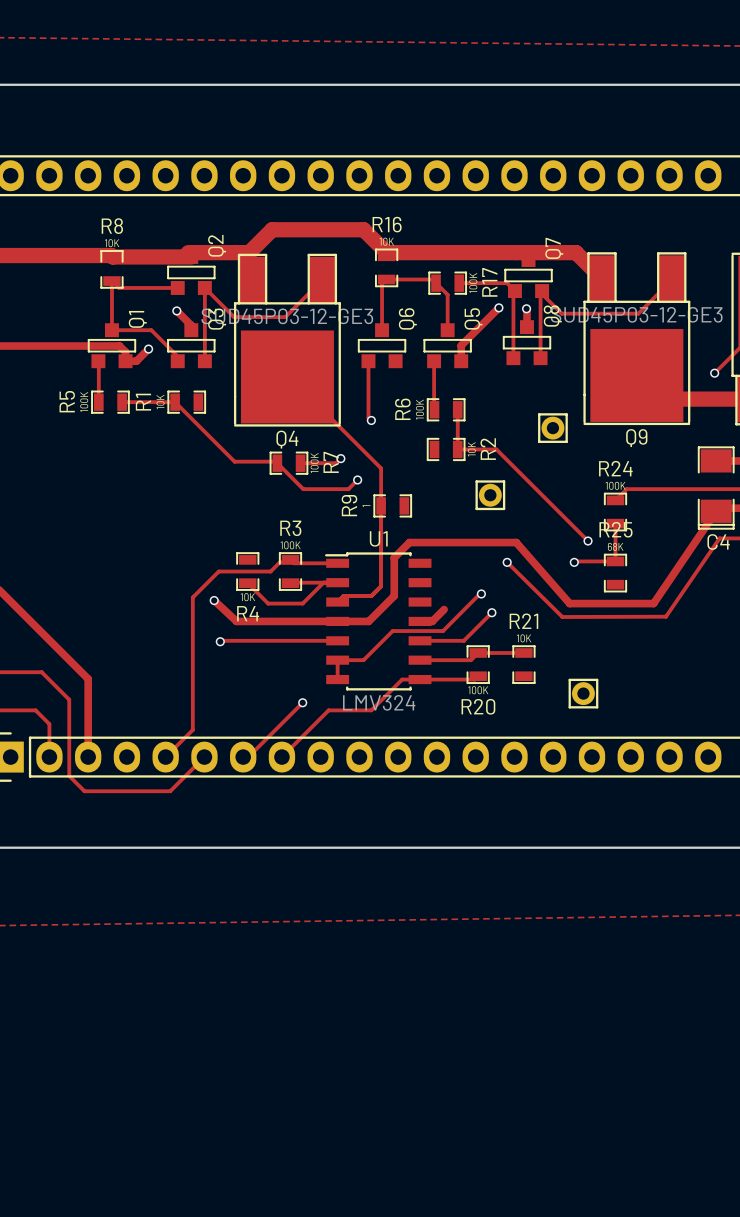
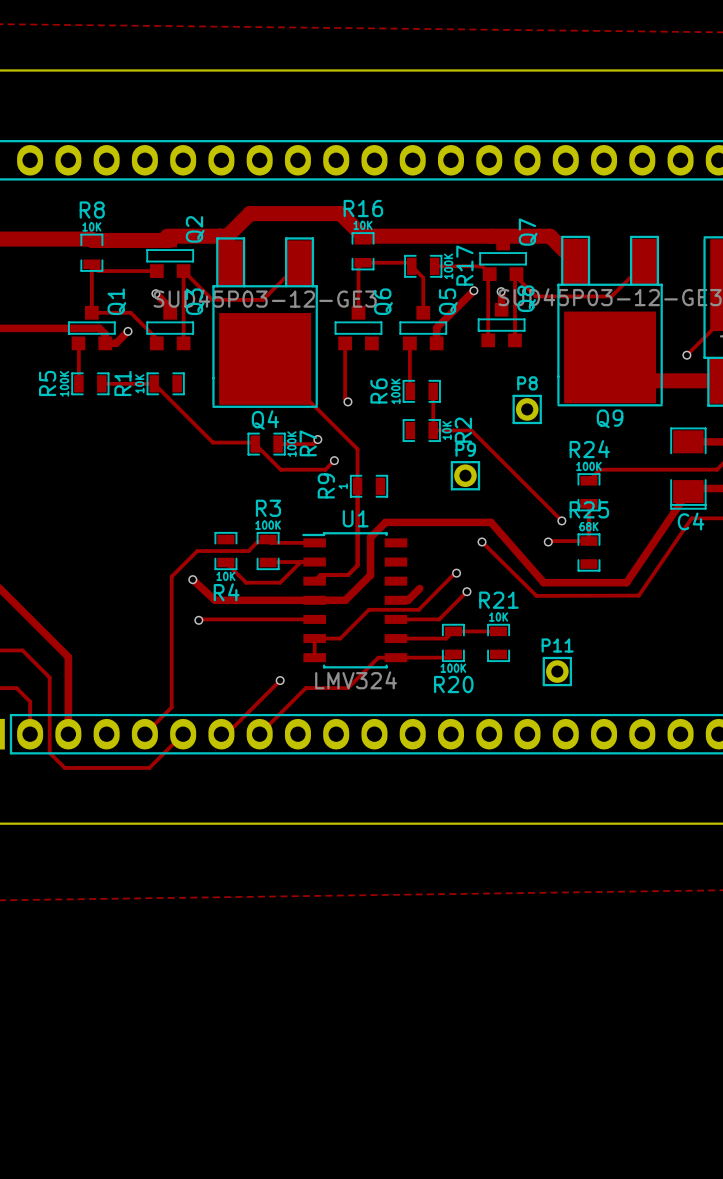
P8 name: none -> P8 (527, 383)
P9 name: none -> P9 (465, 449)
P11 name: none -> P11 (557, 645)

